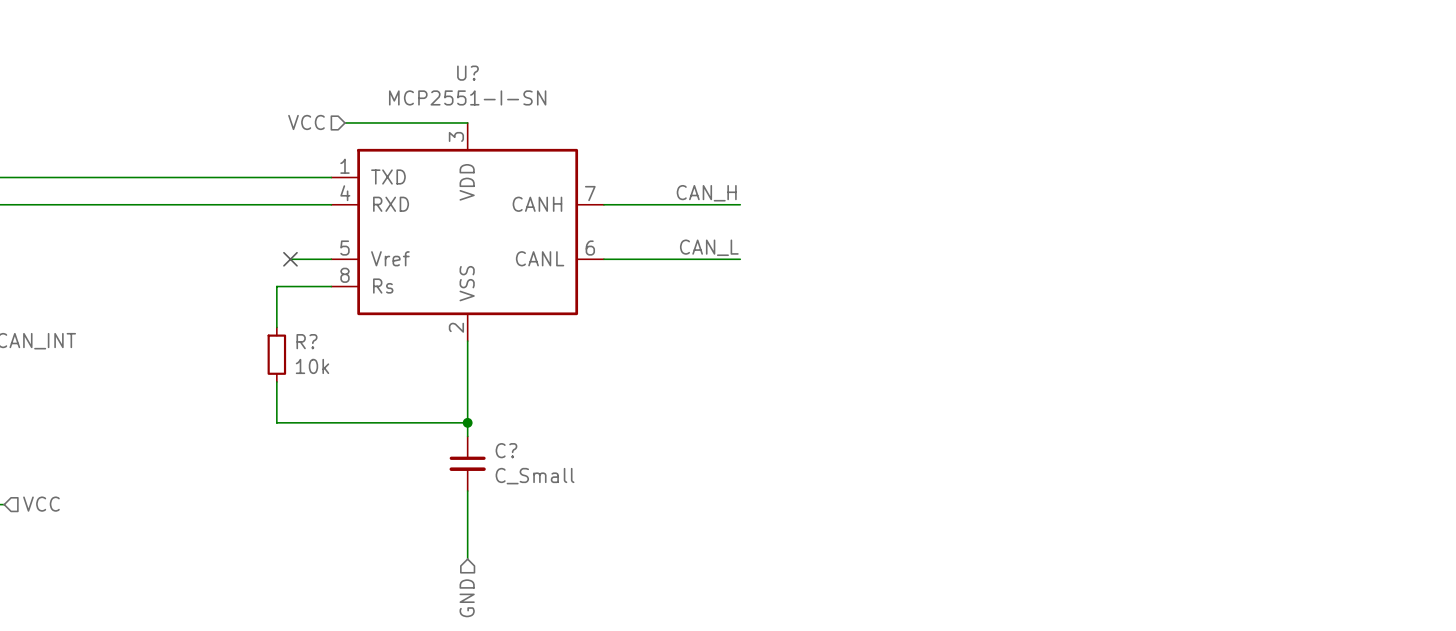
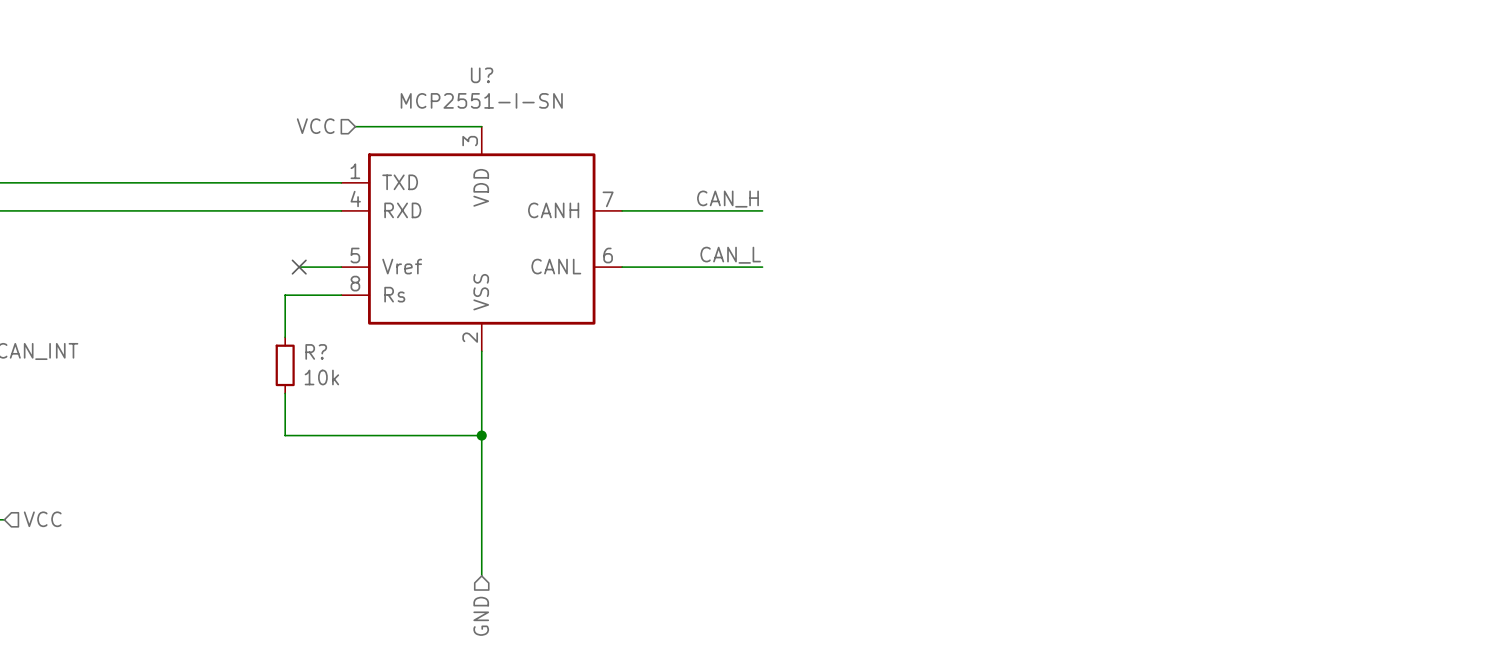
C?: C_Small (467, 463) -> none

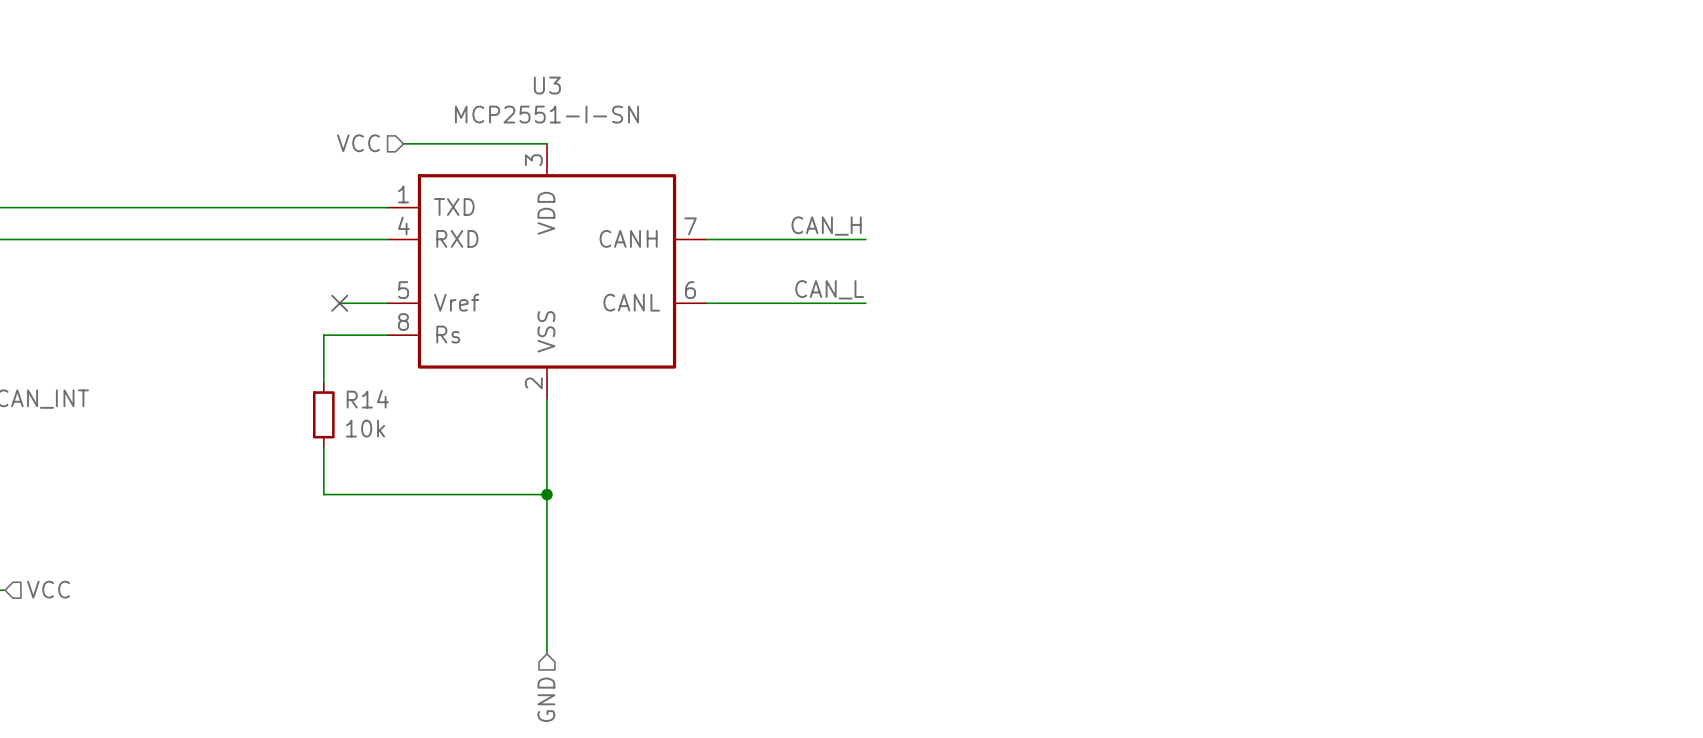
U? name: U? (482, 75) -> U3 (547, 85)
R? name: R? (316, 351) -> R14 (367, 399)

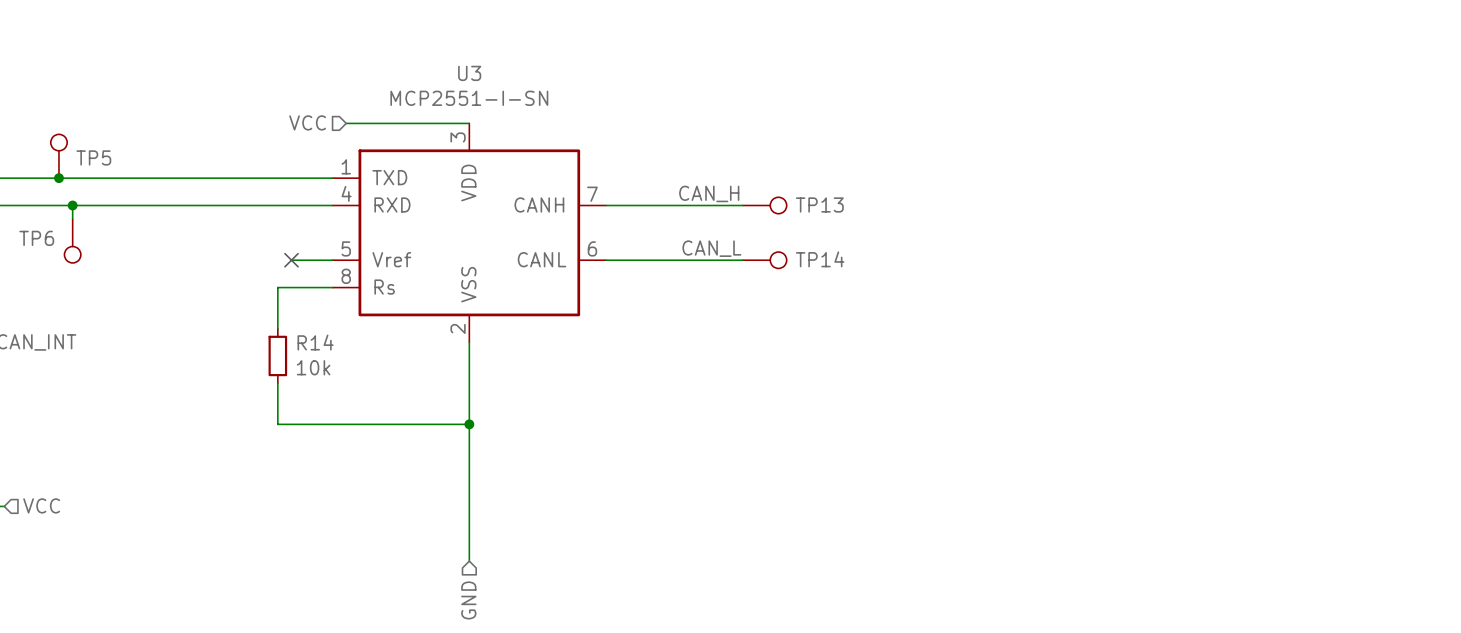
TP5: none -> (58, 156)
junction: none -> (58, 178)
wire: none -> (72, 205) (72, 219)
junction: none -> (72, 205)
TP13: none -> (764, 205)
TP6: none -> (72, 241)
TP14: none -> (764, 260)

